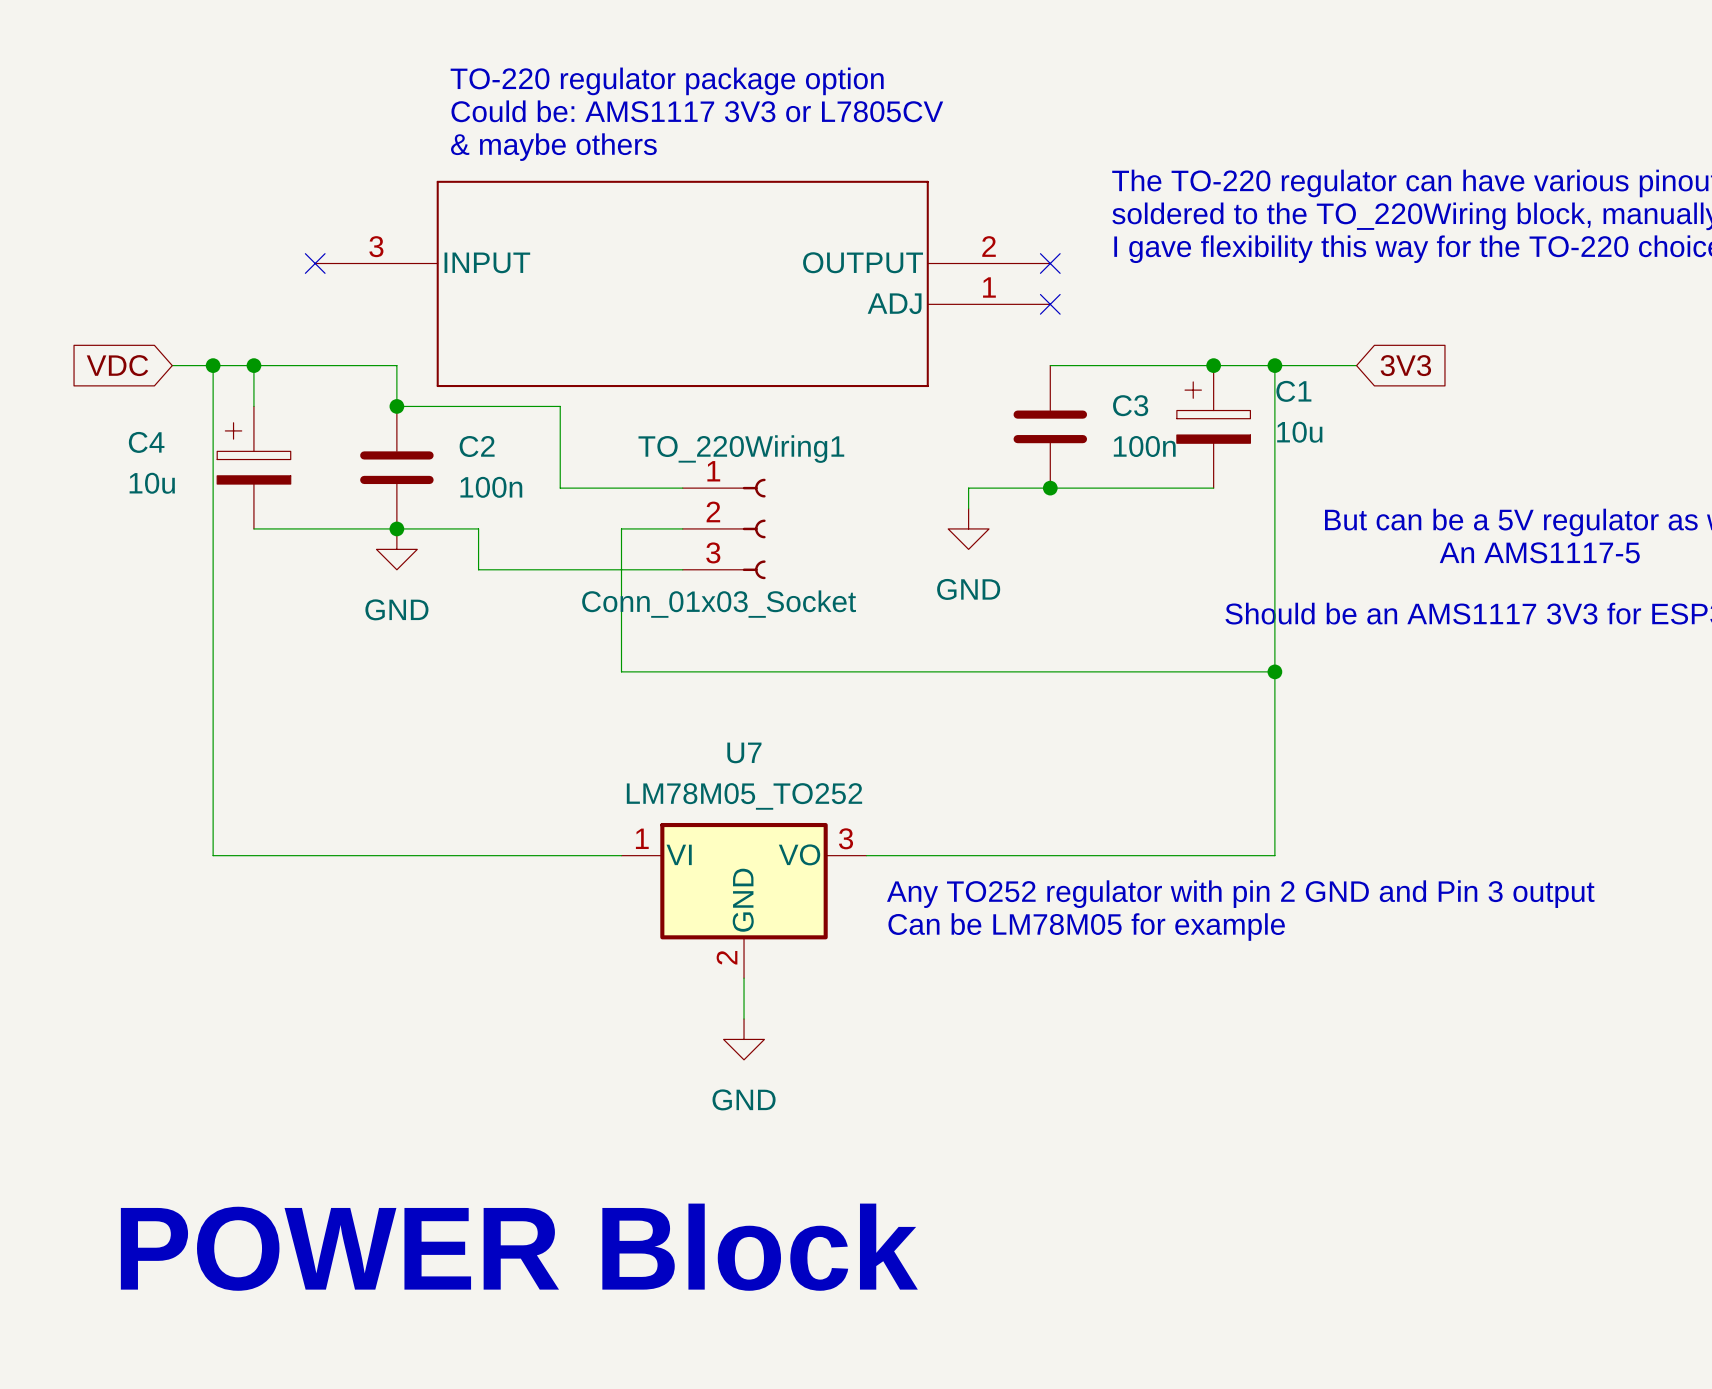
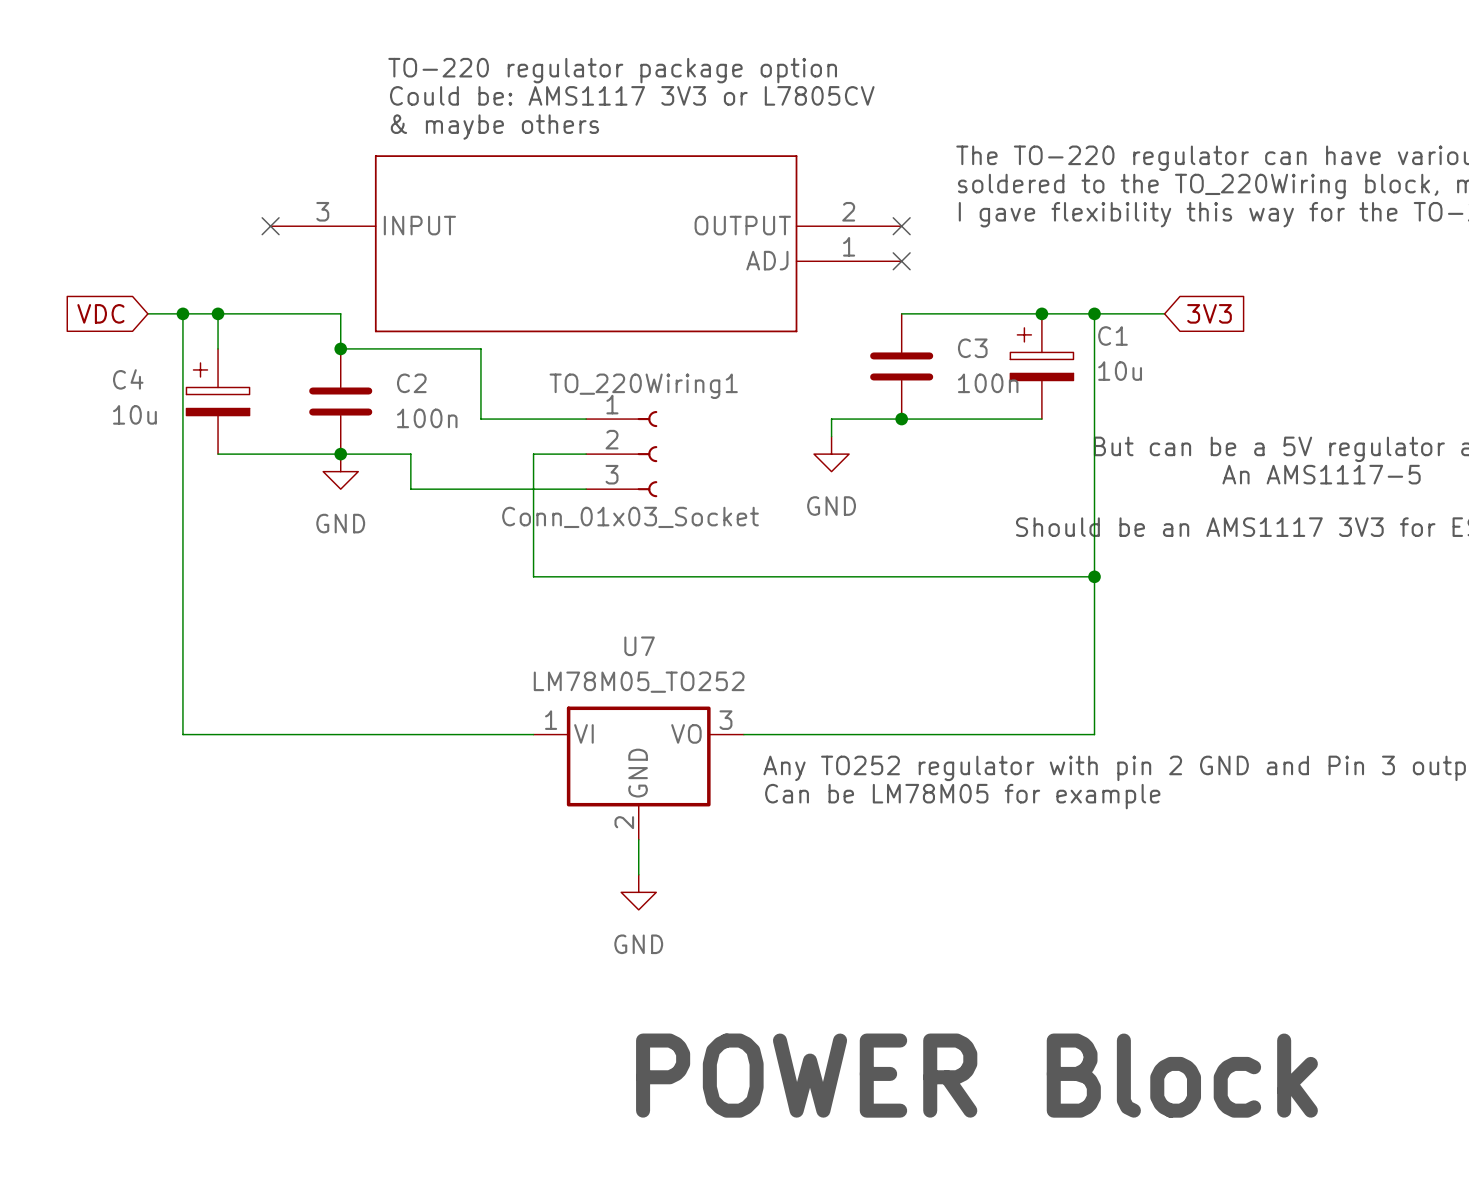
text: POWER Block (519, 1247) -> none
text: none -> POWER Block (976, 1075)

